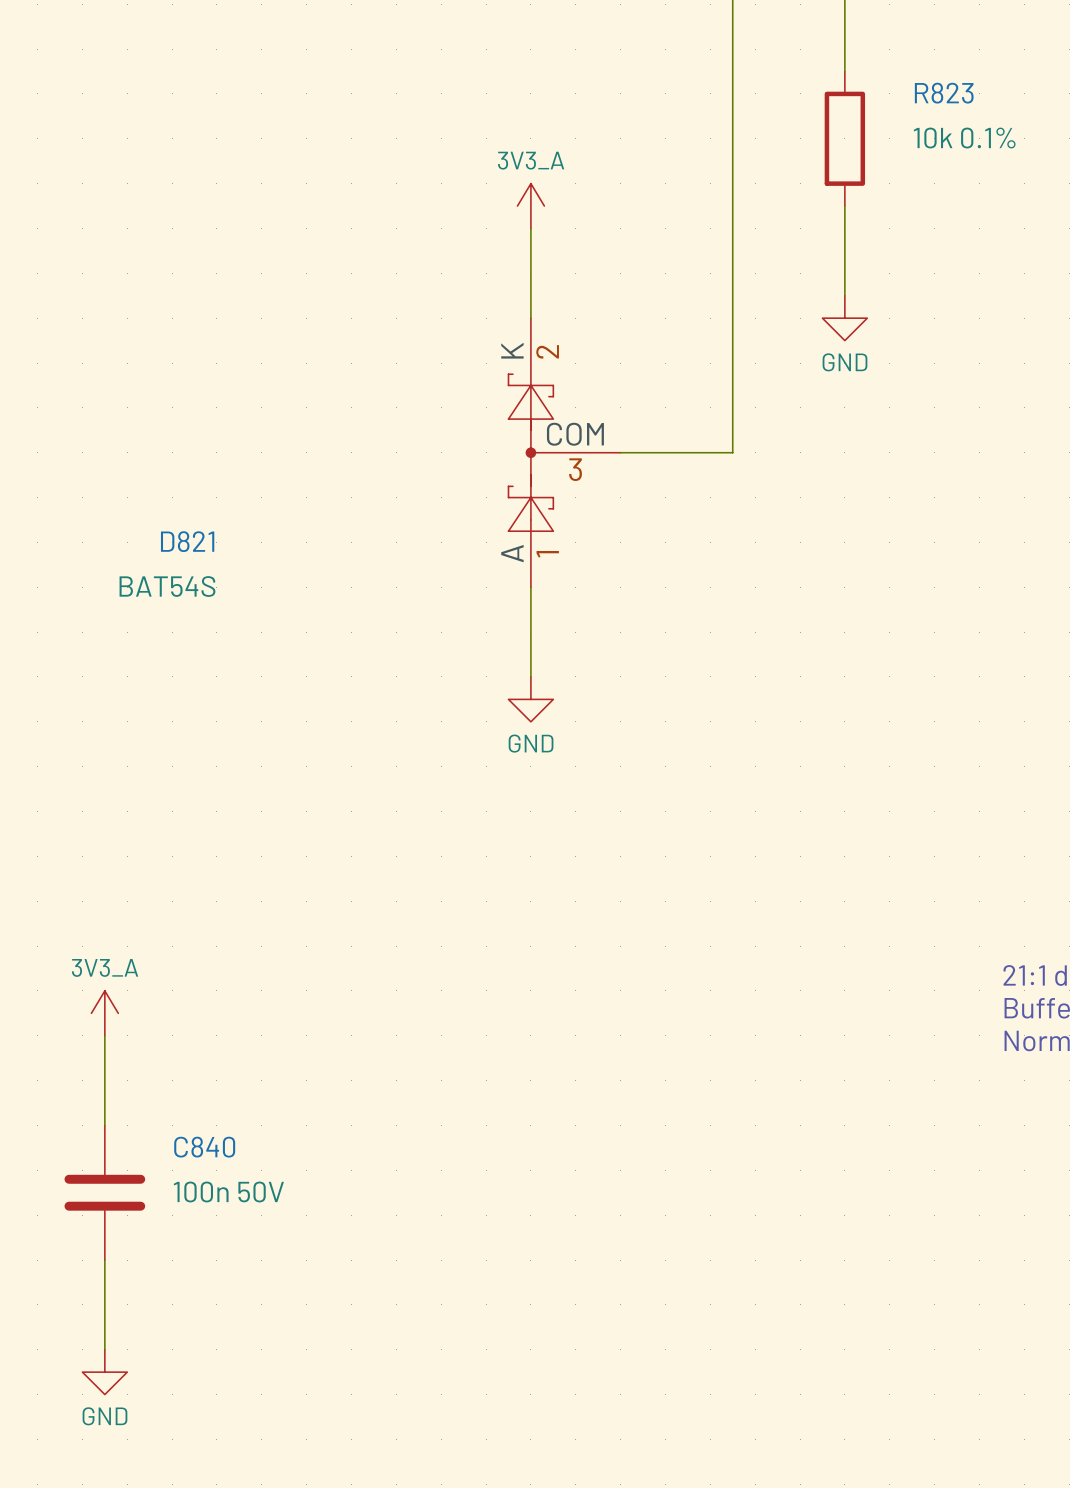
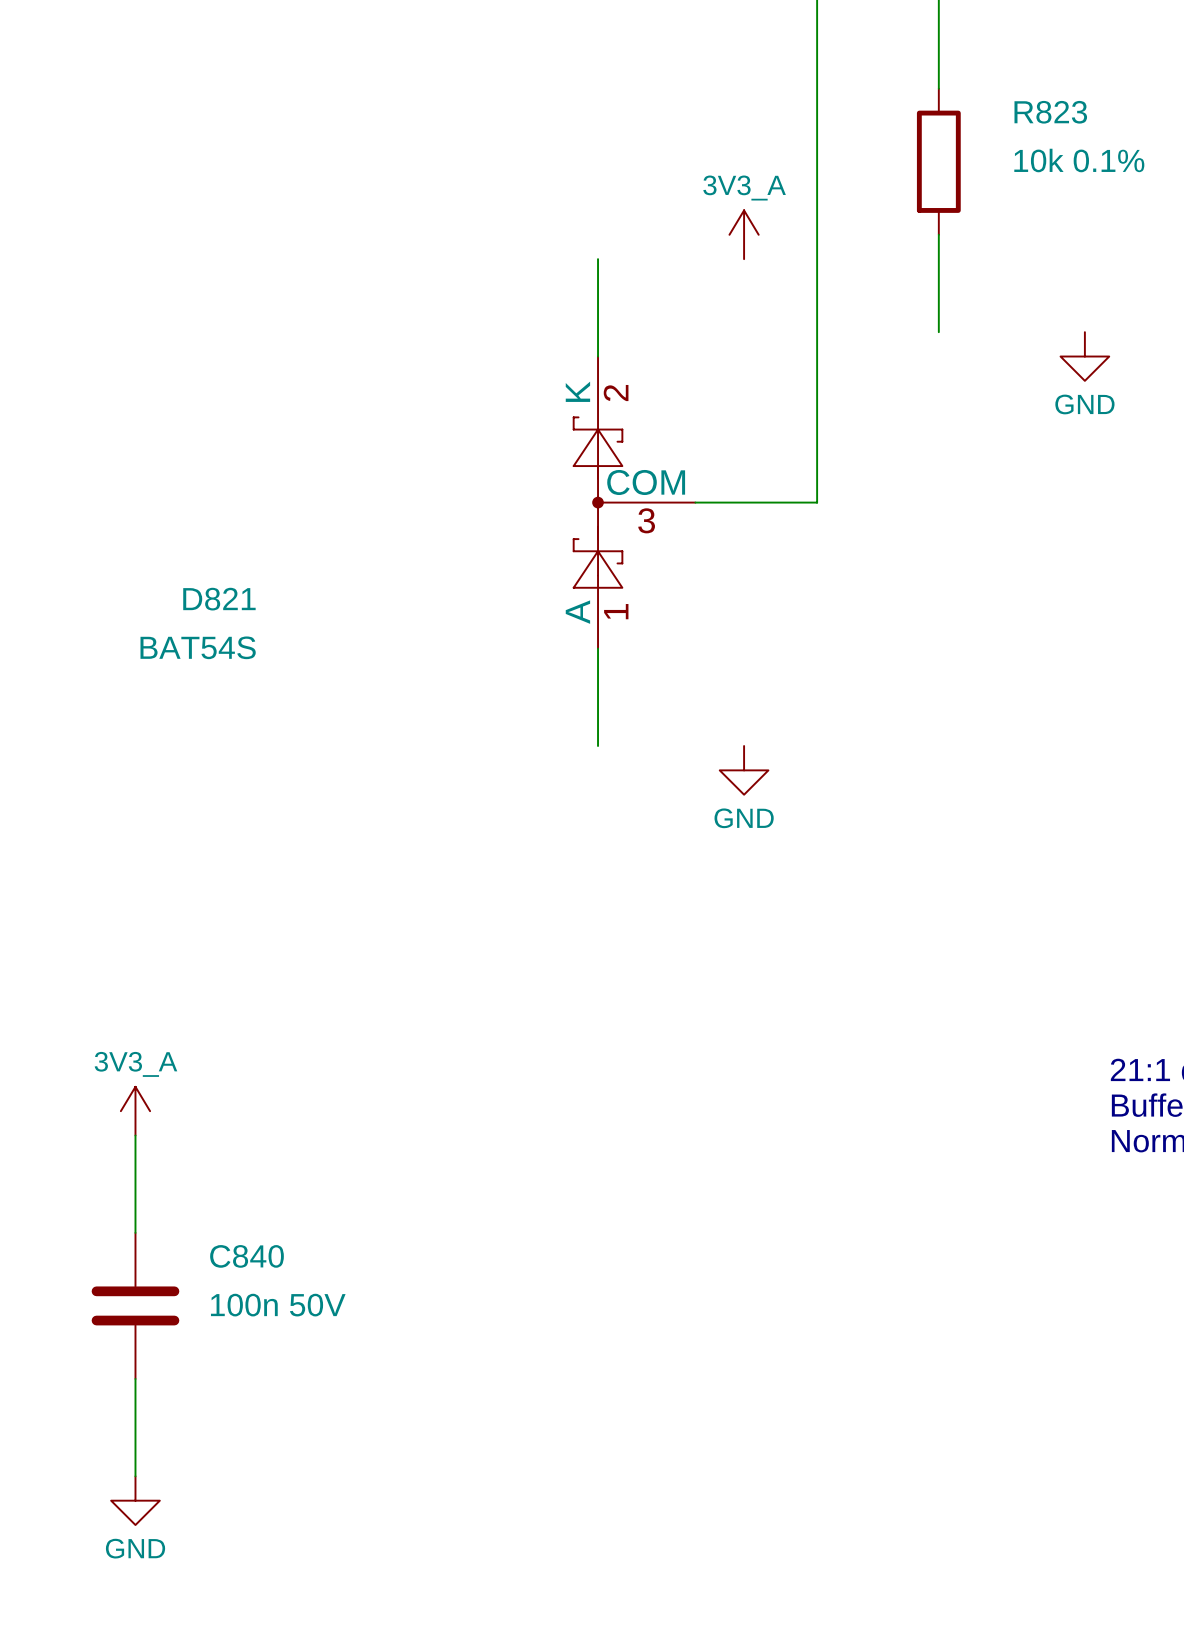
power symbol position: 3V3_A (530, 206) -> 3V3_A (744, 234)
power symbol: GND (844, 318) -> none
power symbol: none -> GND (1084, 356)
power symbol position: GND (530, 699) -> GND (744, 770)

